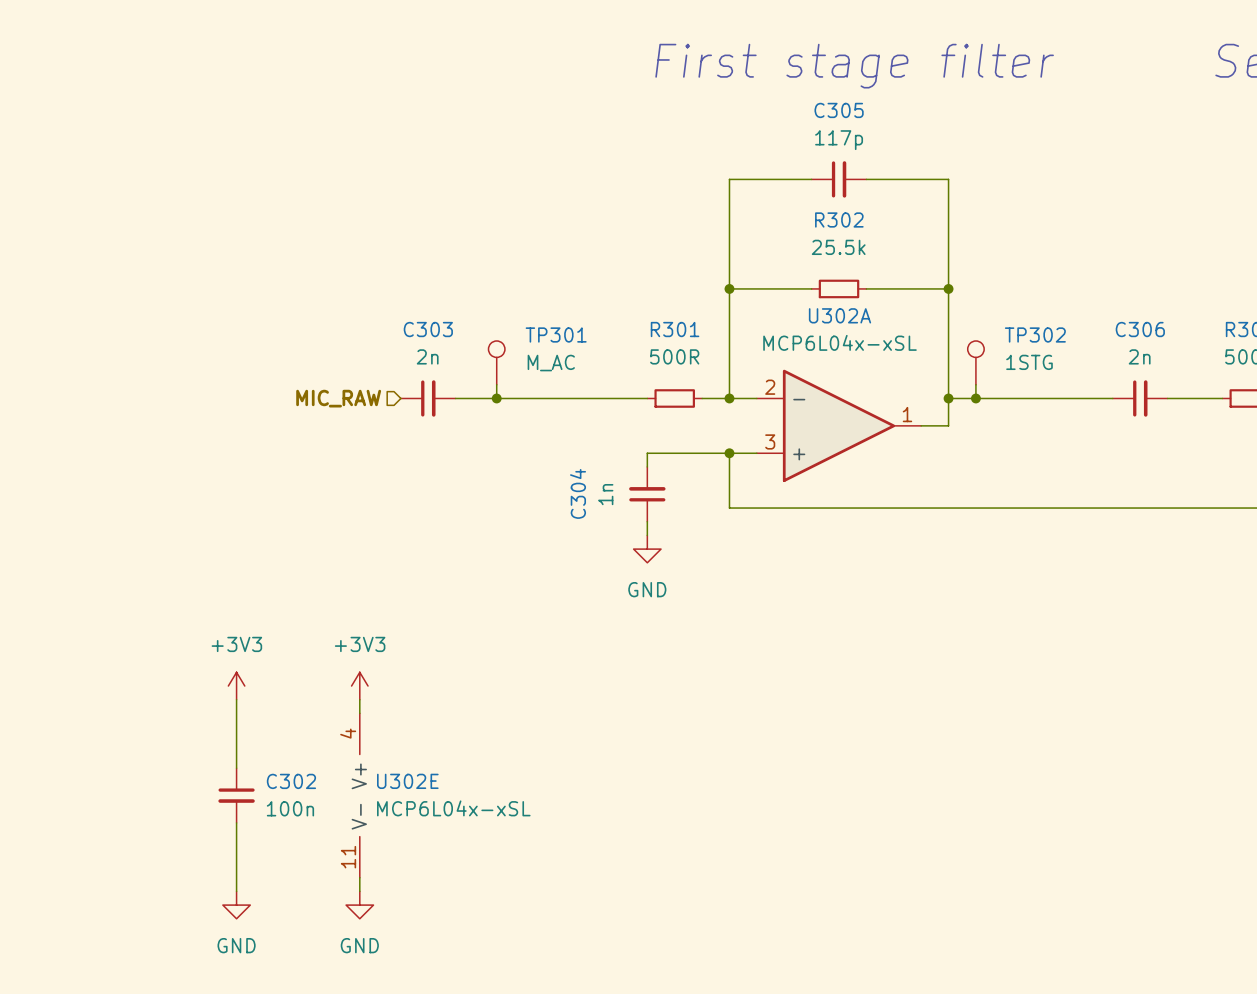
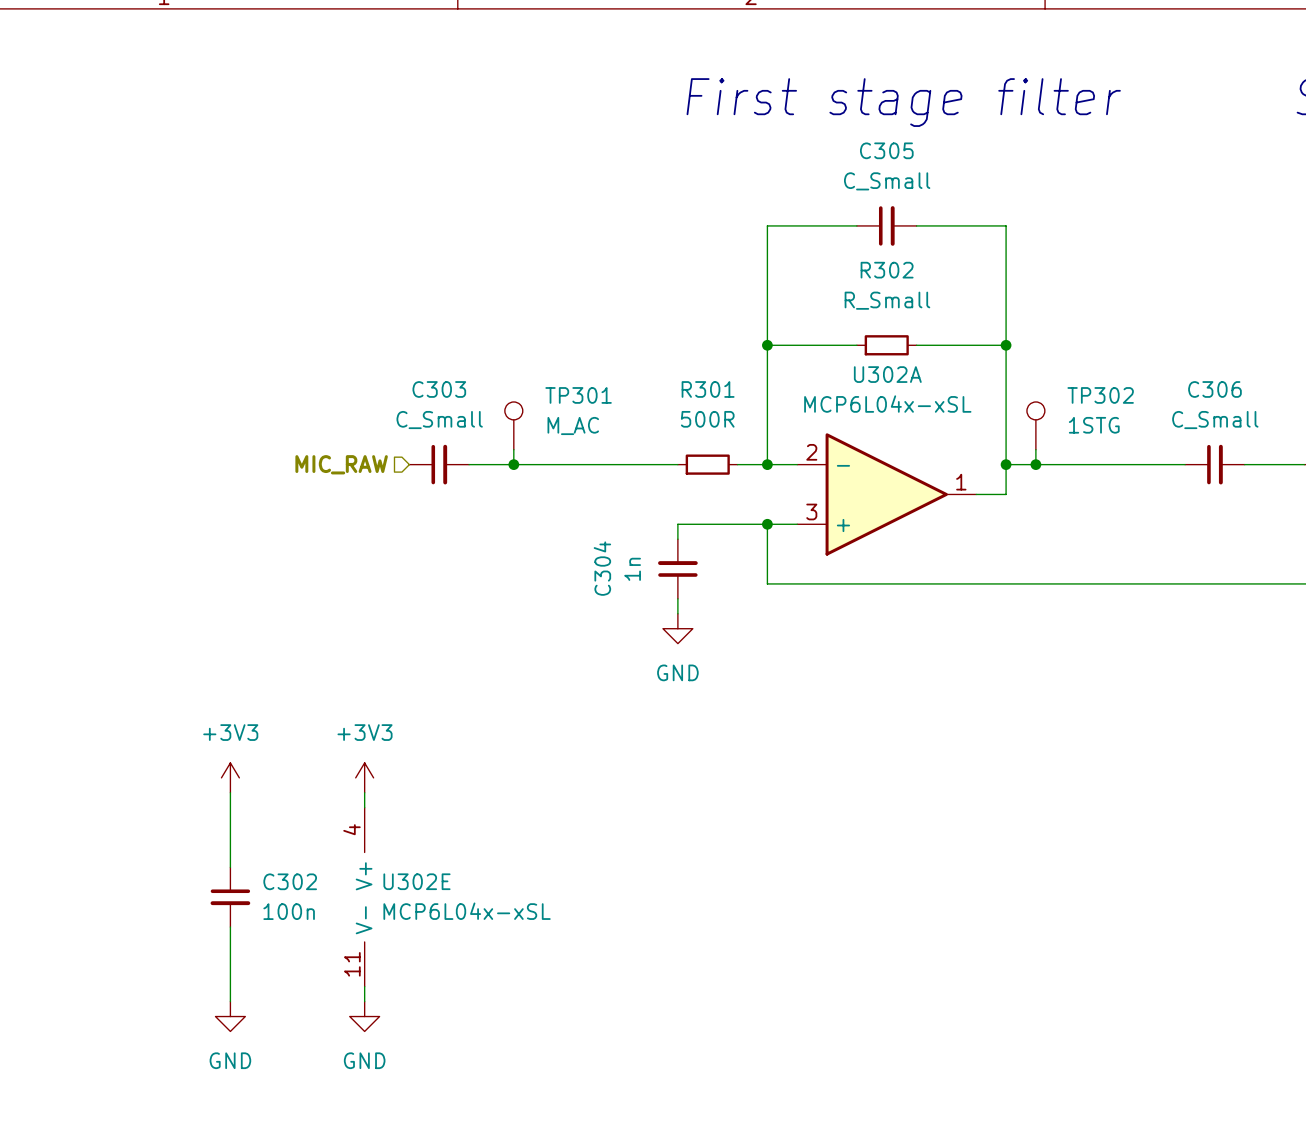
C305 value: 117p (839, 140) -> C_Small (887, 181)
R302 value: 25.5k (838, 247) -> R_Small (887, 300)
C303 value: 2n (427, 356) -> C_Small (439, 420)
C306 value: 2n (1139, 356) -> C_Small (1215, 420)

